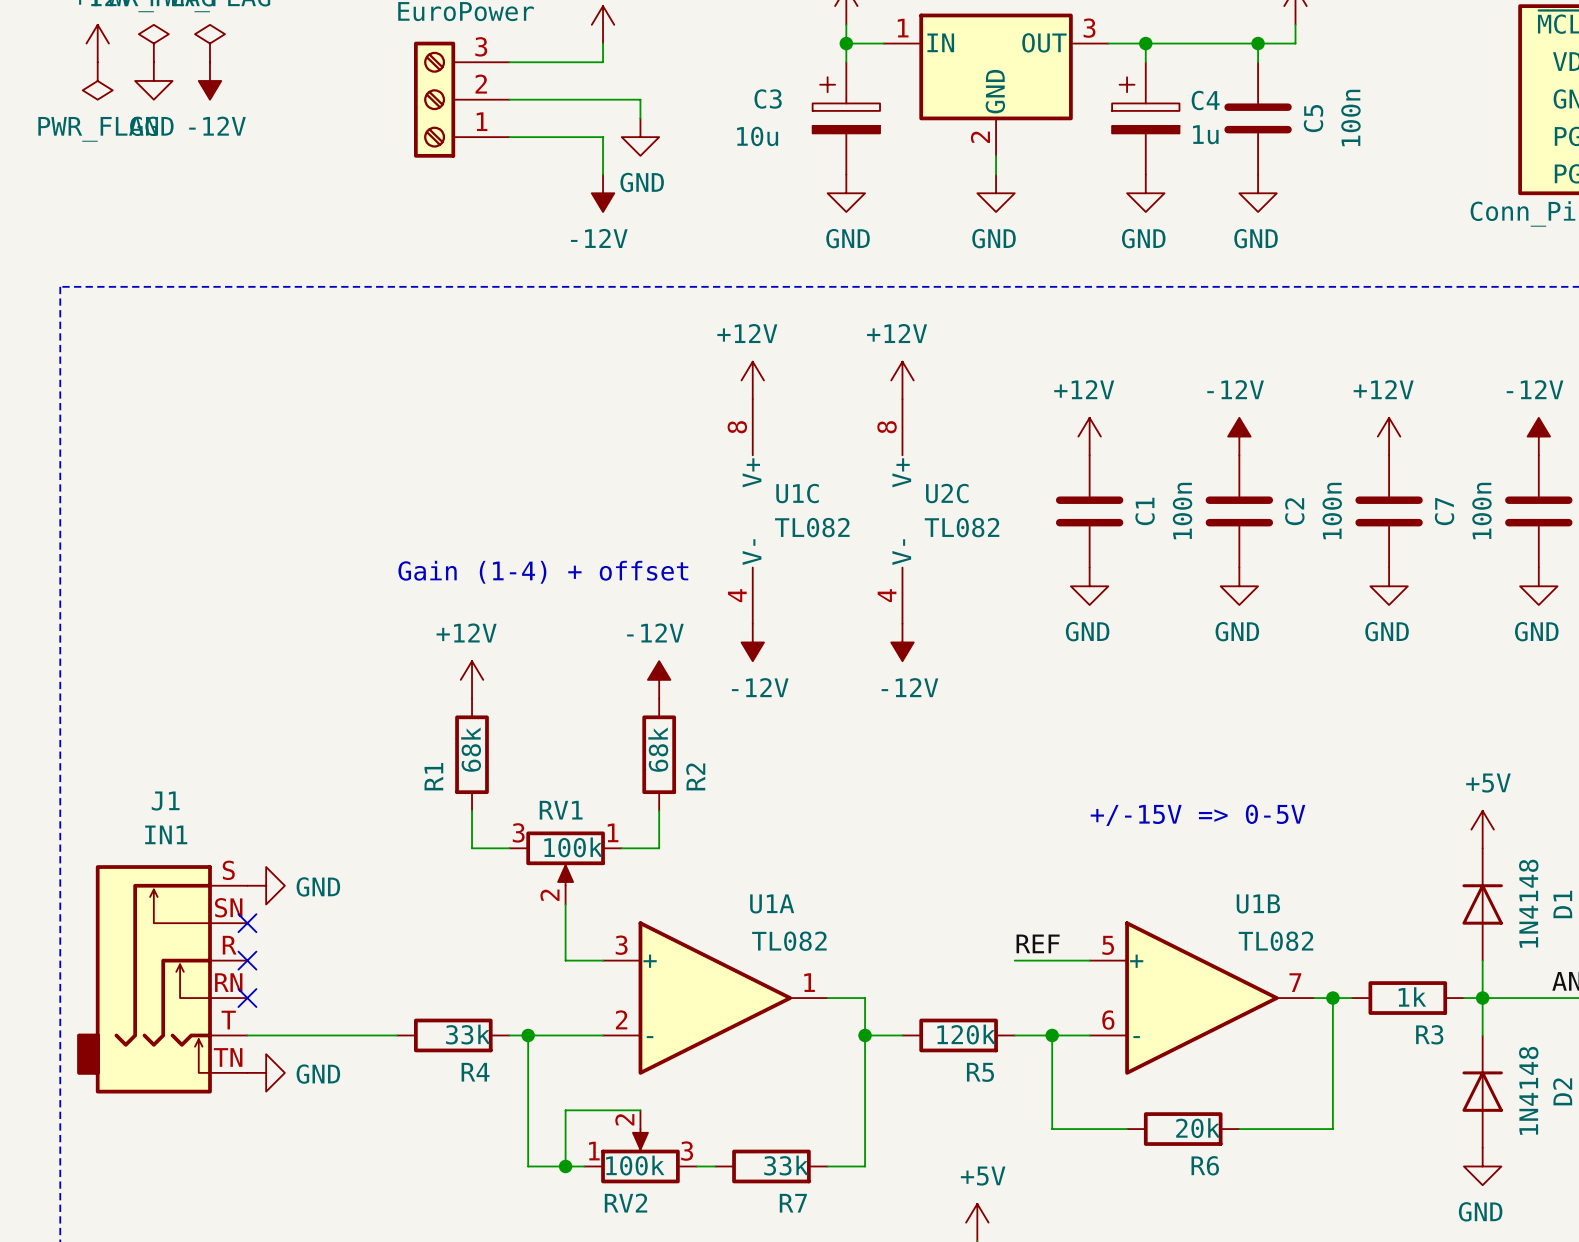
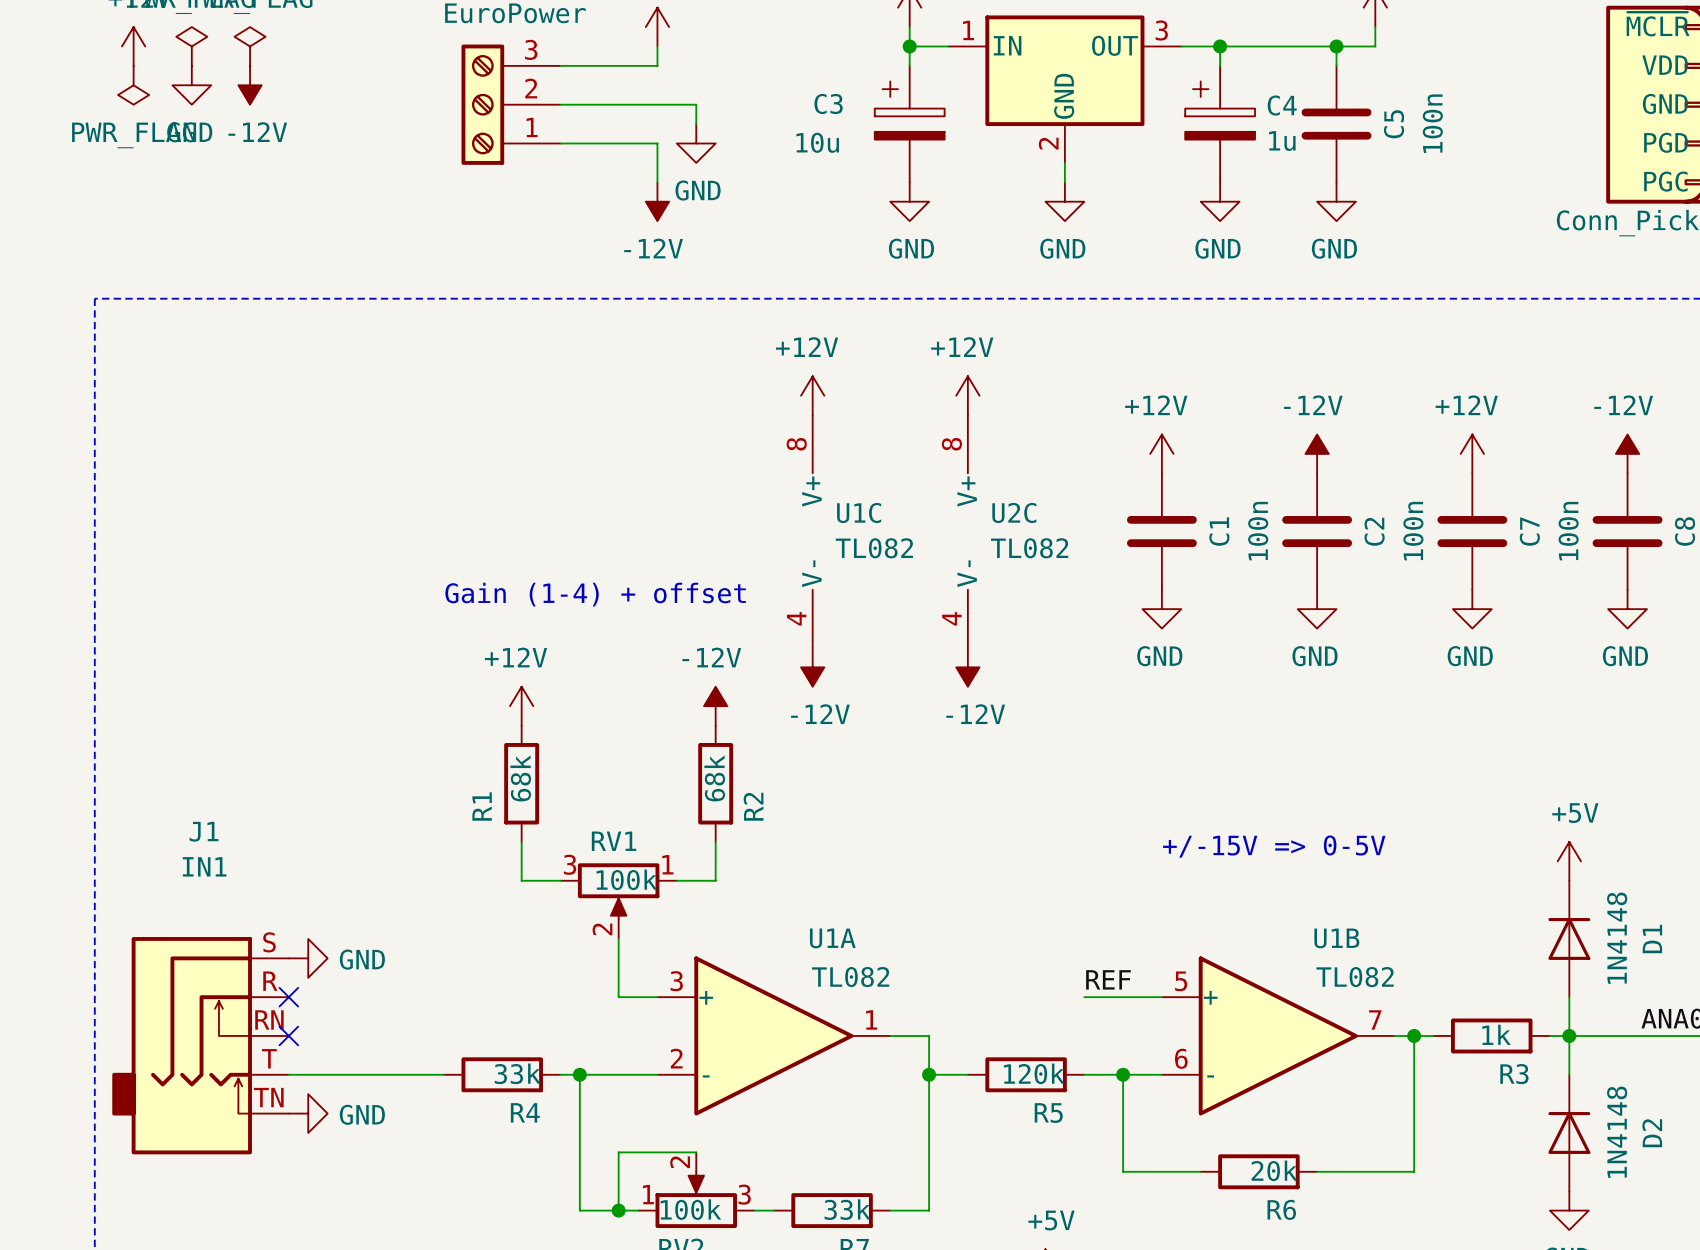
J1 symbol: [77, 865, 248, 1094] -> [112, 937, 289, 1155]
power symbol position: GND (266, 885) -> GND (308, 958)
no-connect mark: (247, 923) -> none

